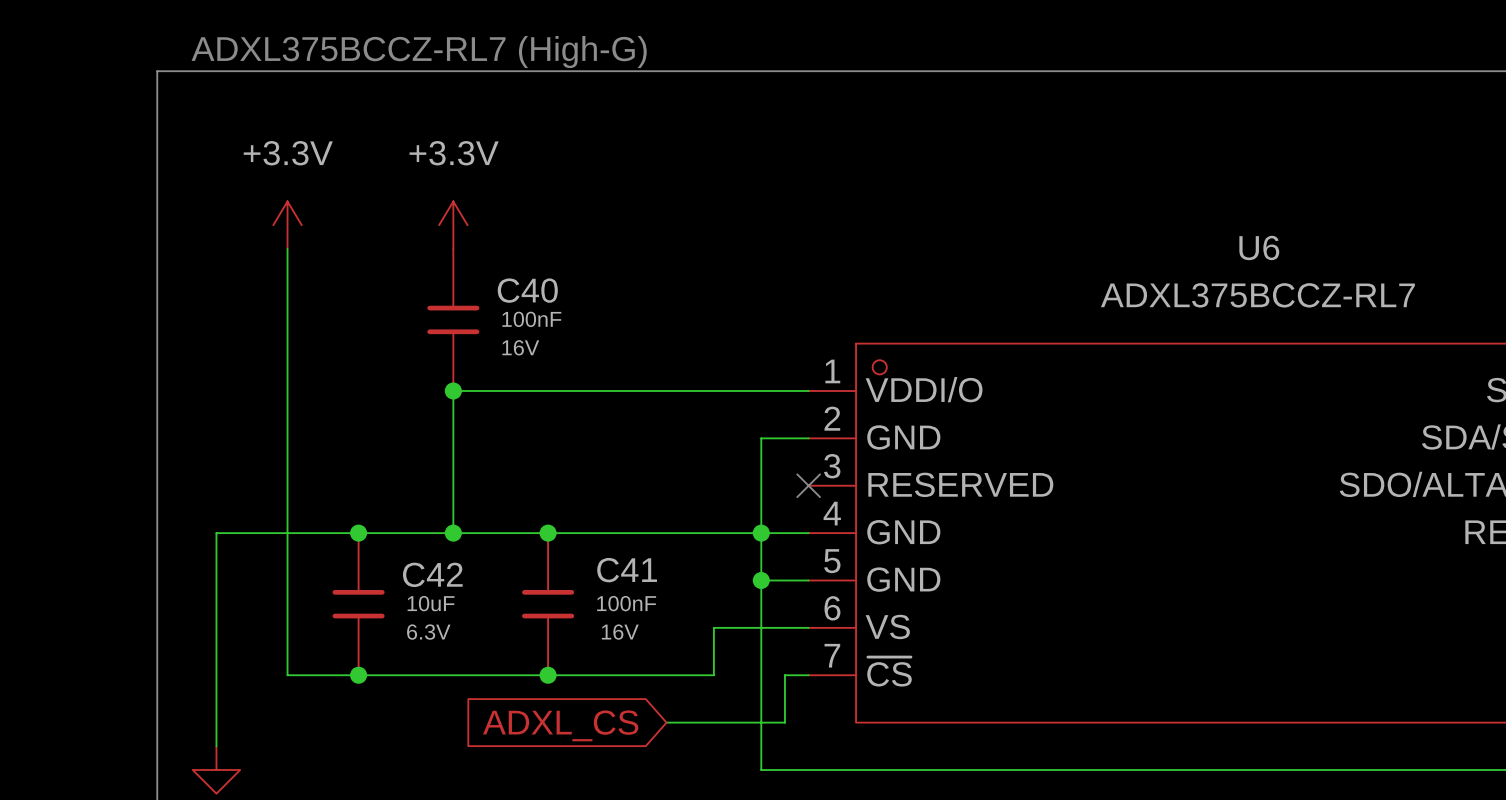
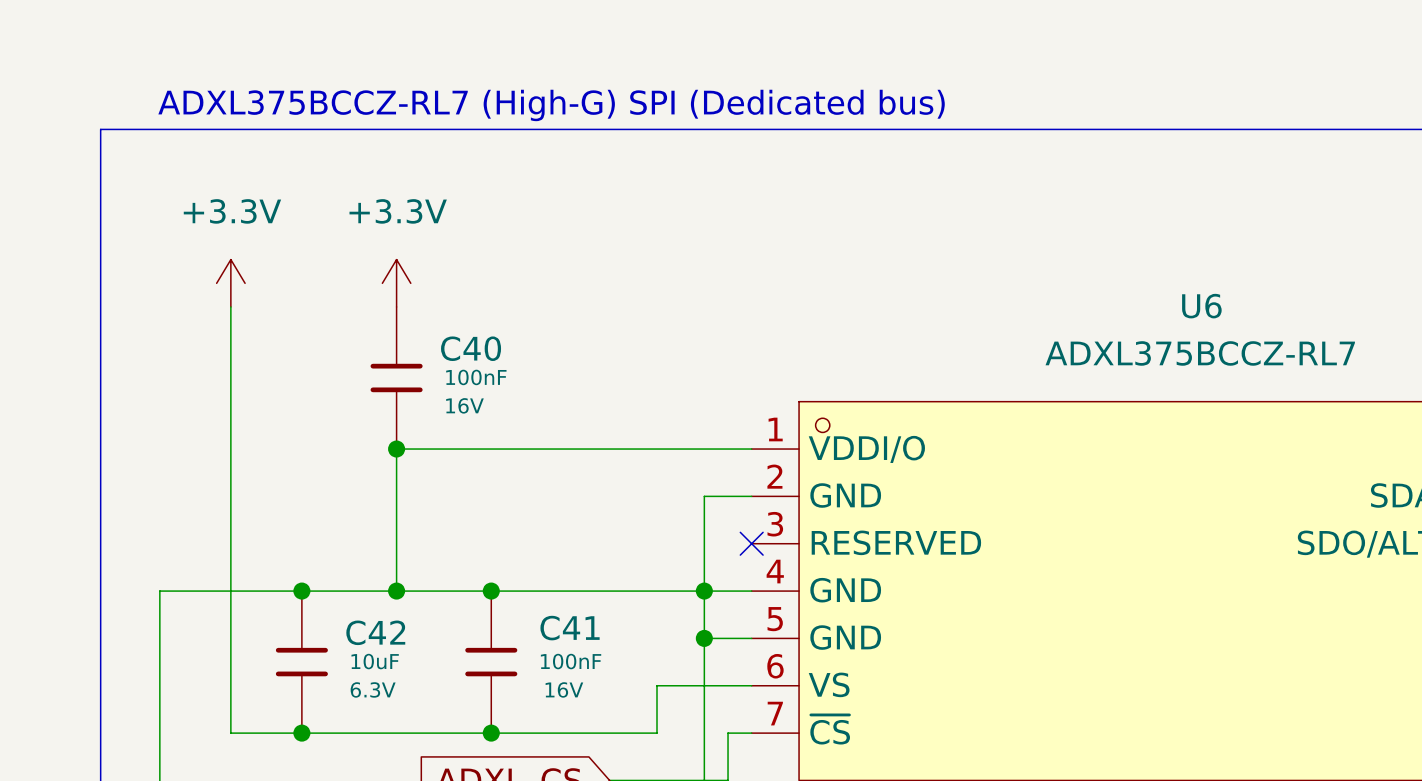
text: ADXL375BCCZ-RL7 (High-G) (419, 52) -> ADXL375BCCZ-RL7 (High-G) SPI (Dedicated bus) (551, 105)

